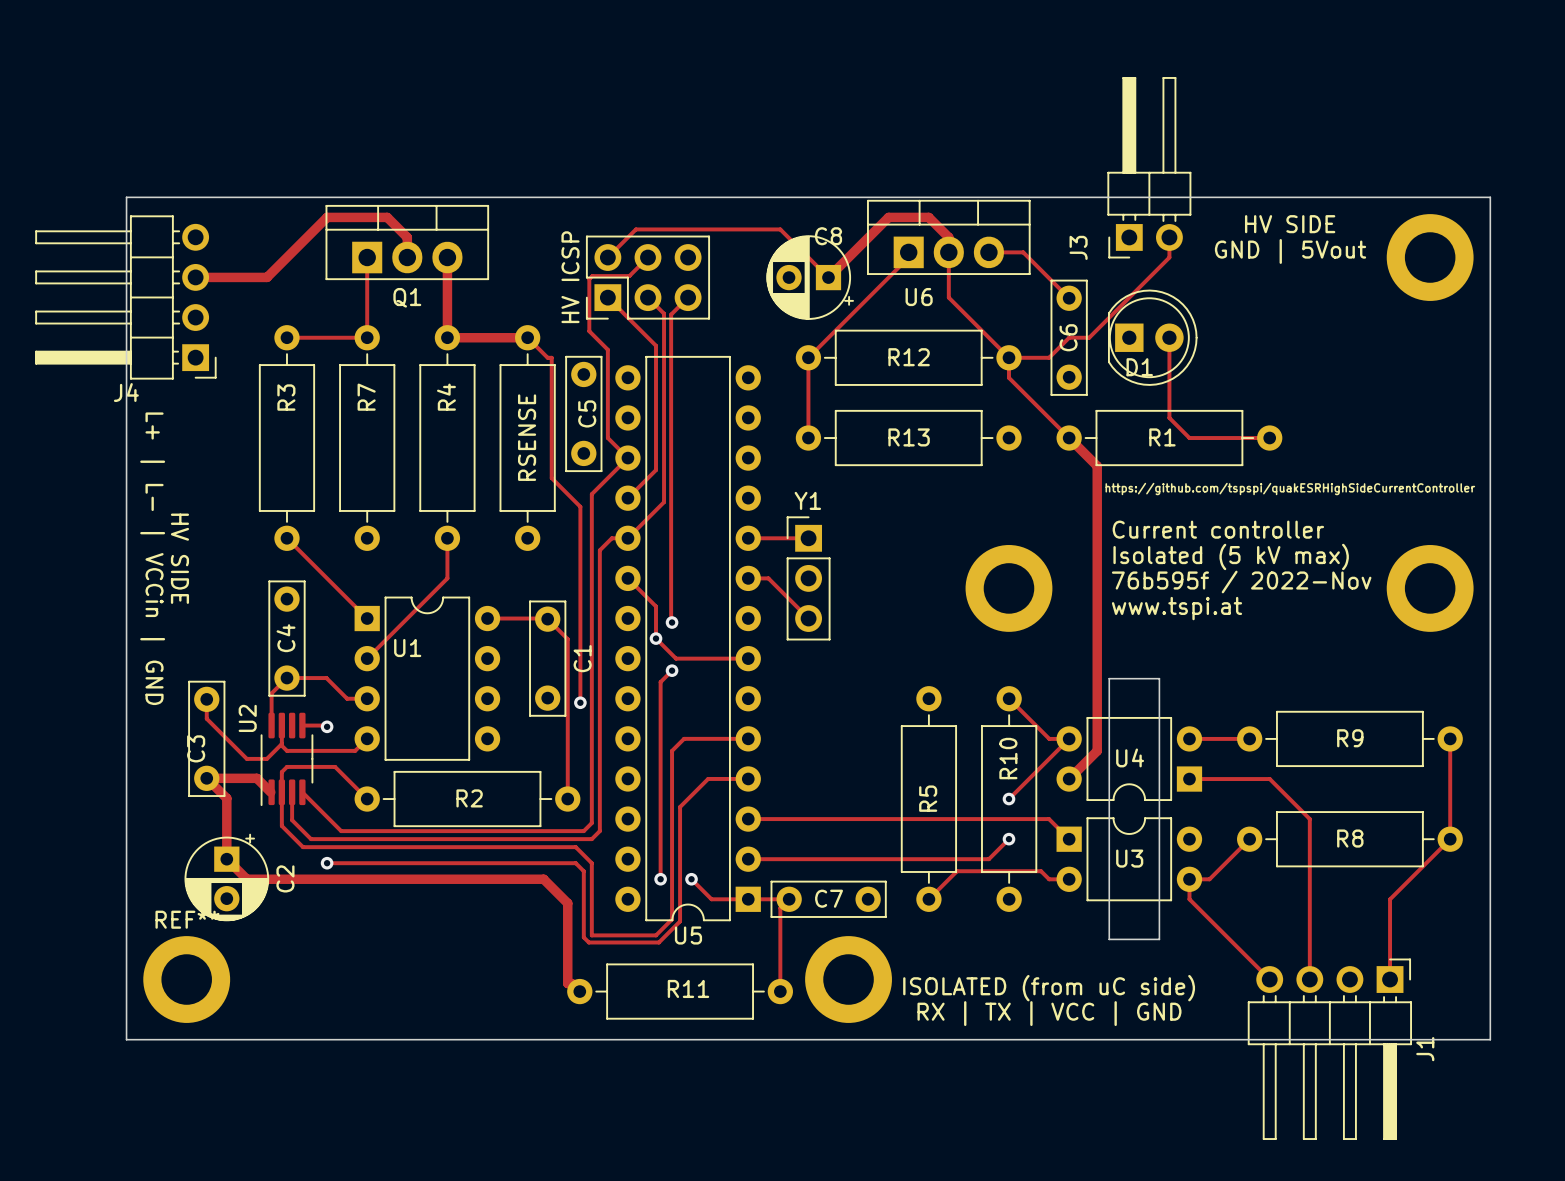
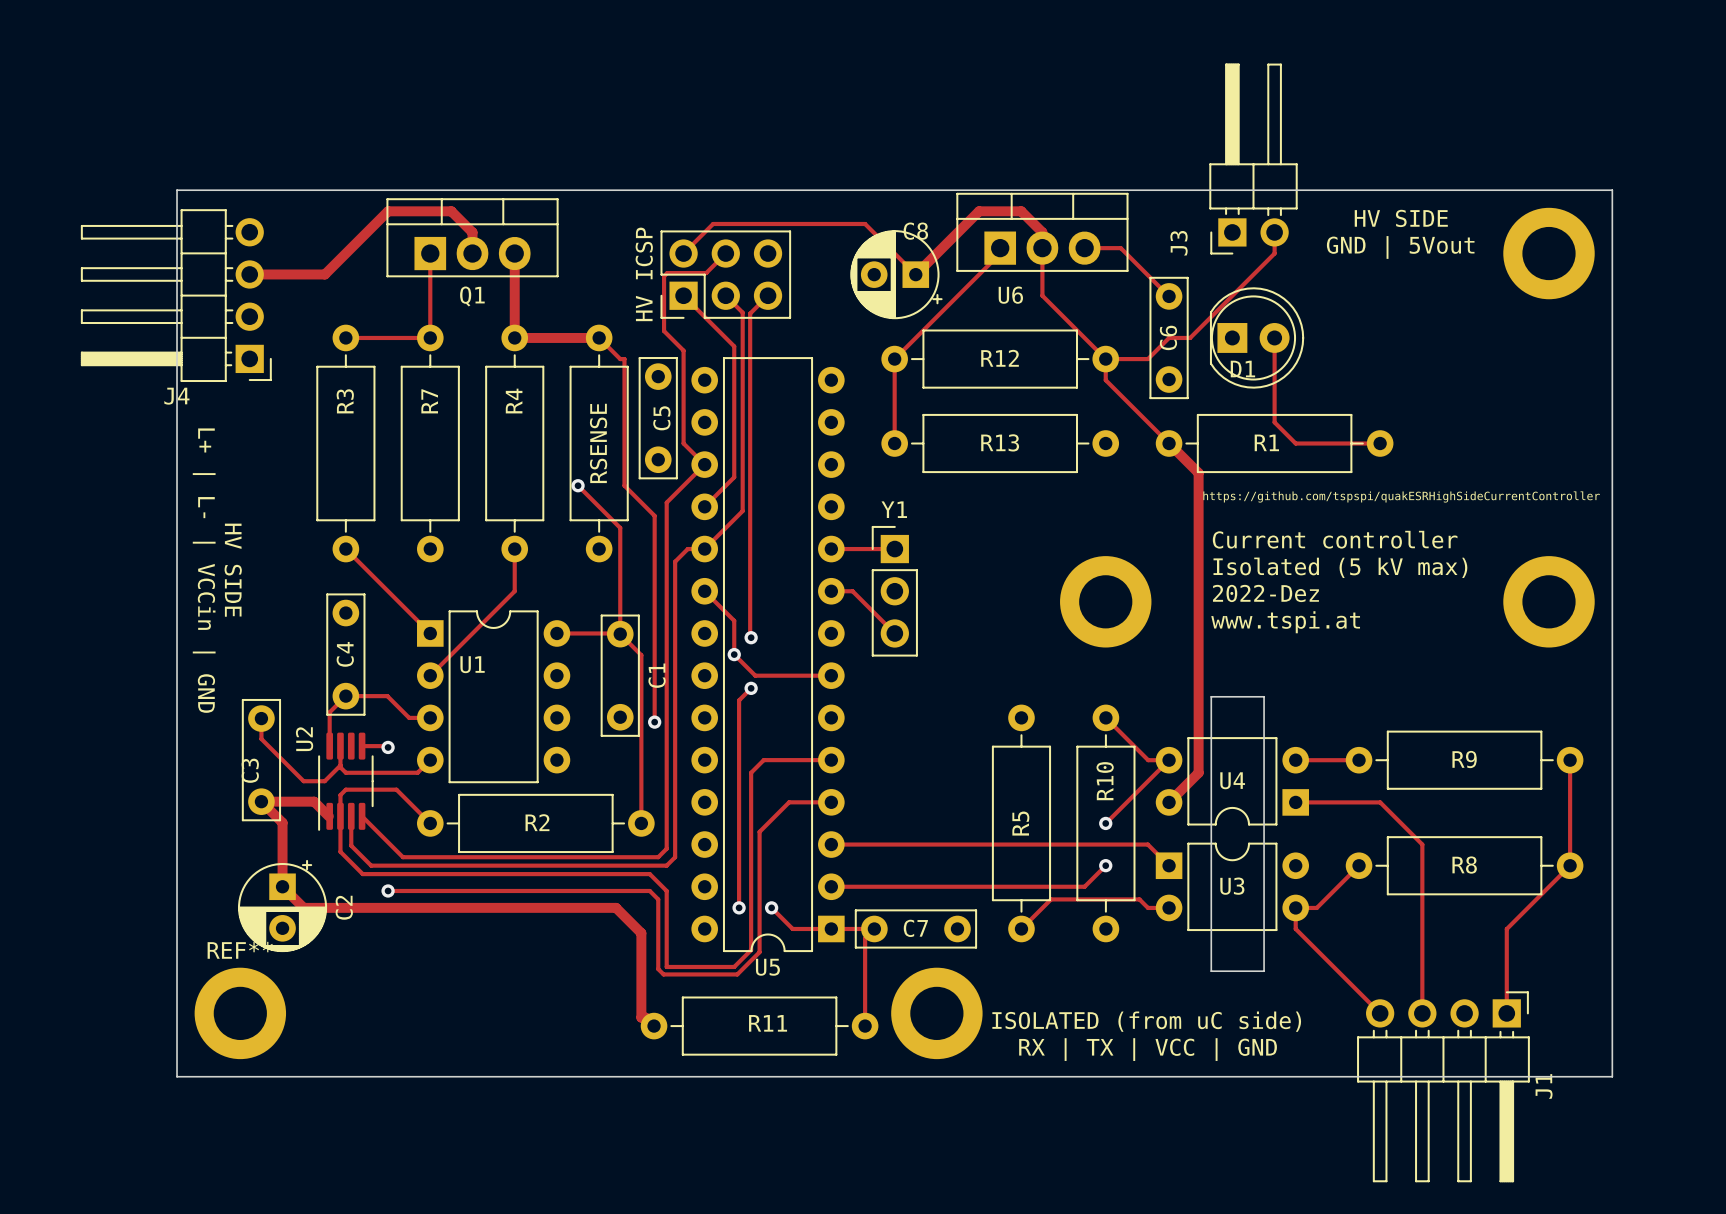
track: none -> (578, 485) (620, 527) (620, 634)
via: none -> (578, 485)
text: 76b595f / 2022-Nov (1241, 582) -> 2022-Dez (1265, 593)

